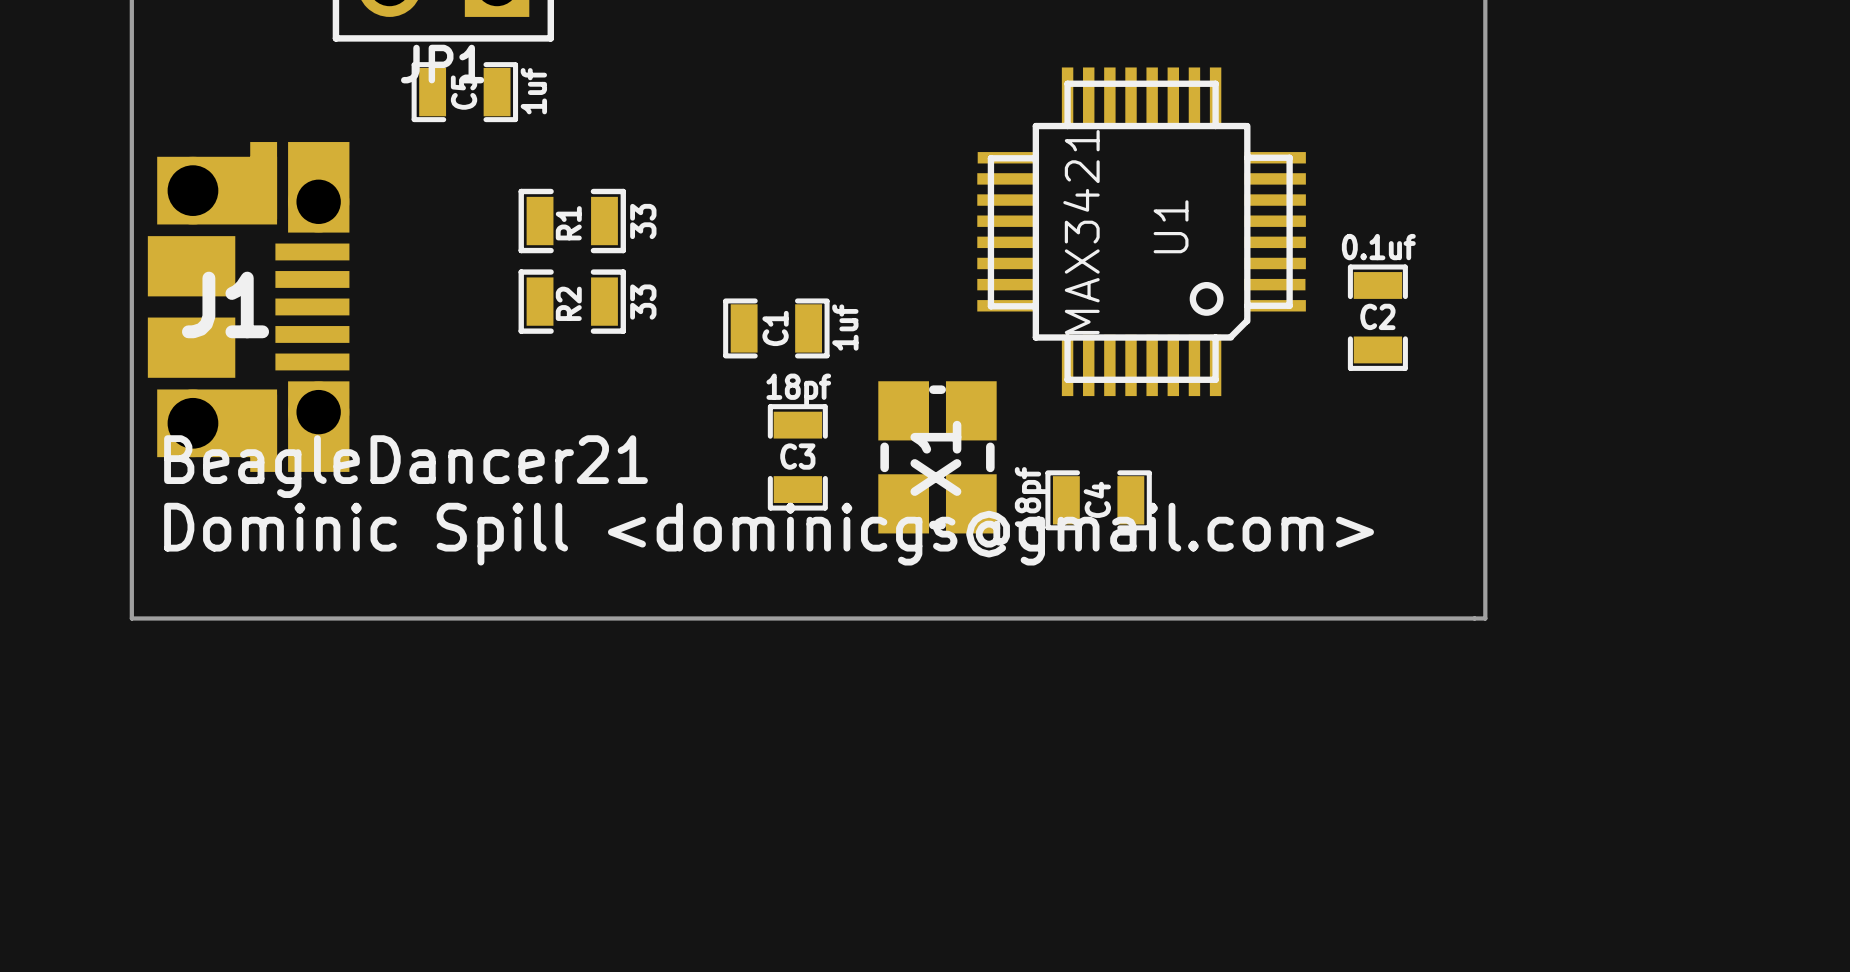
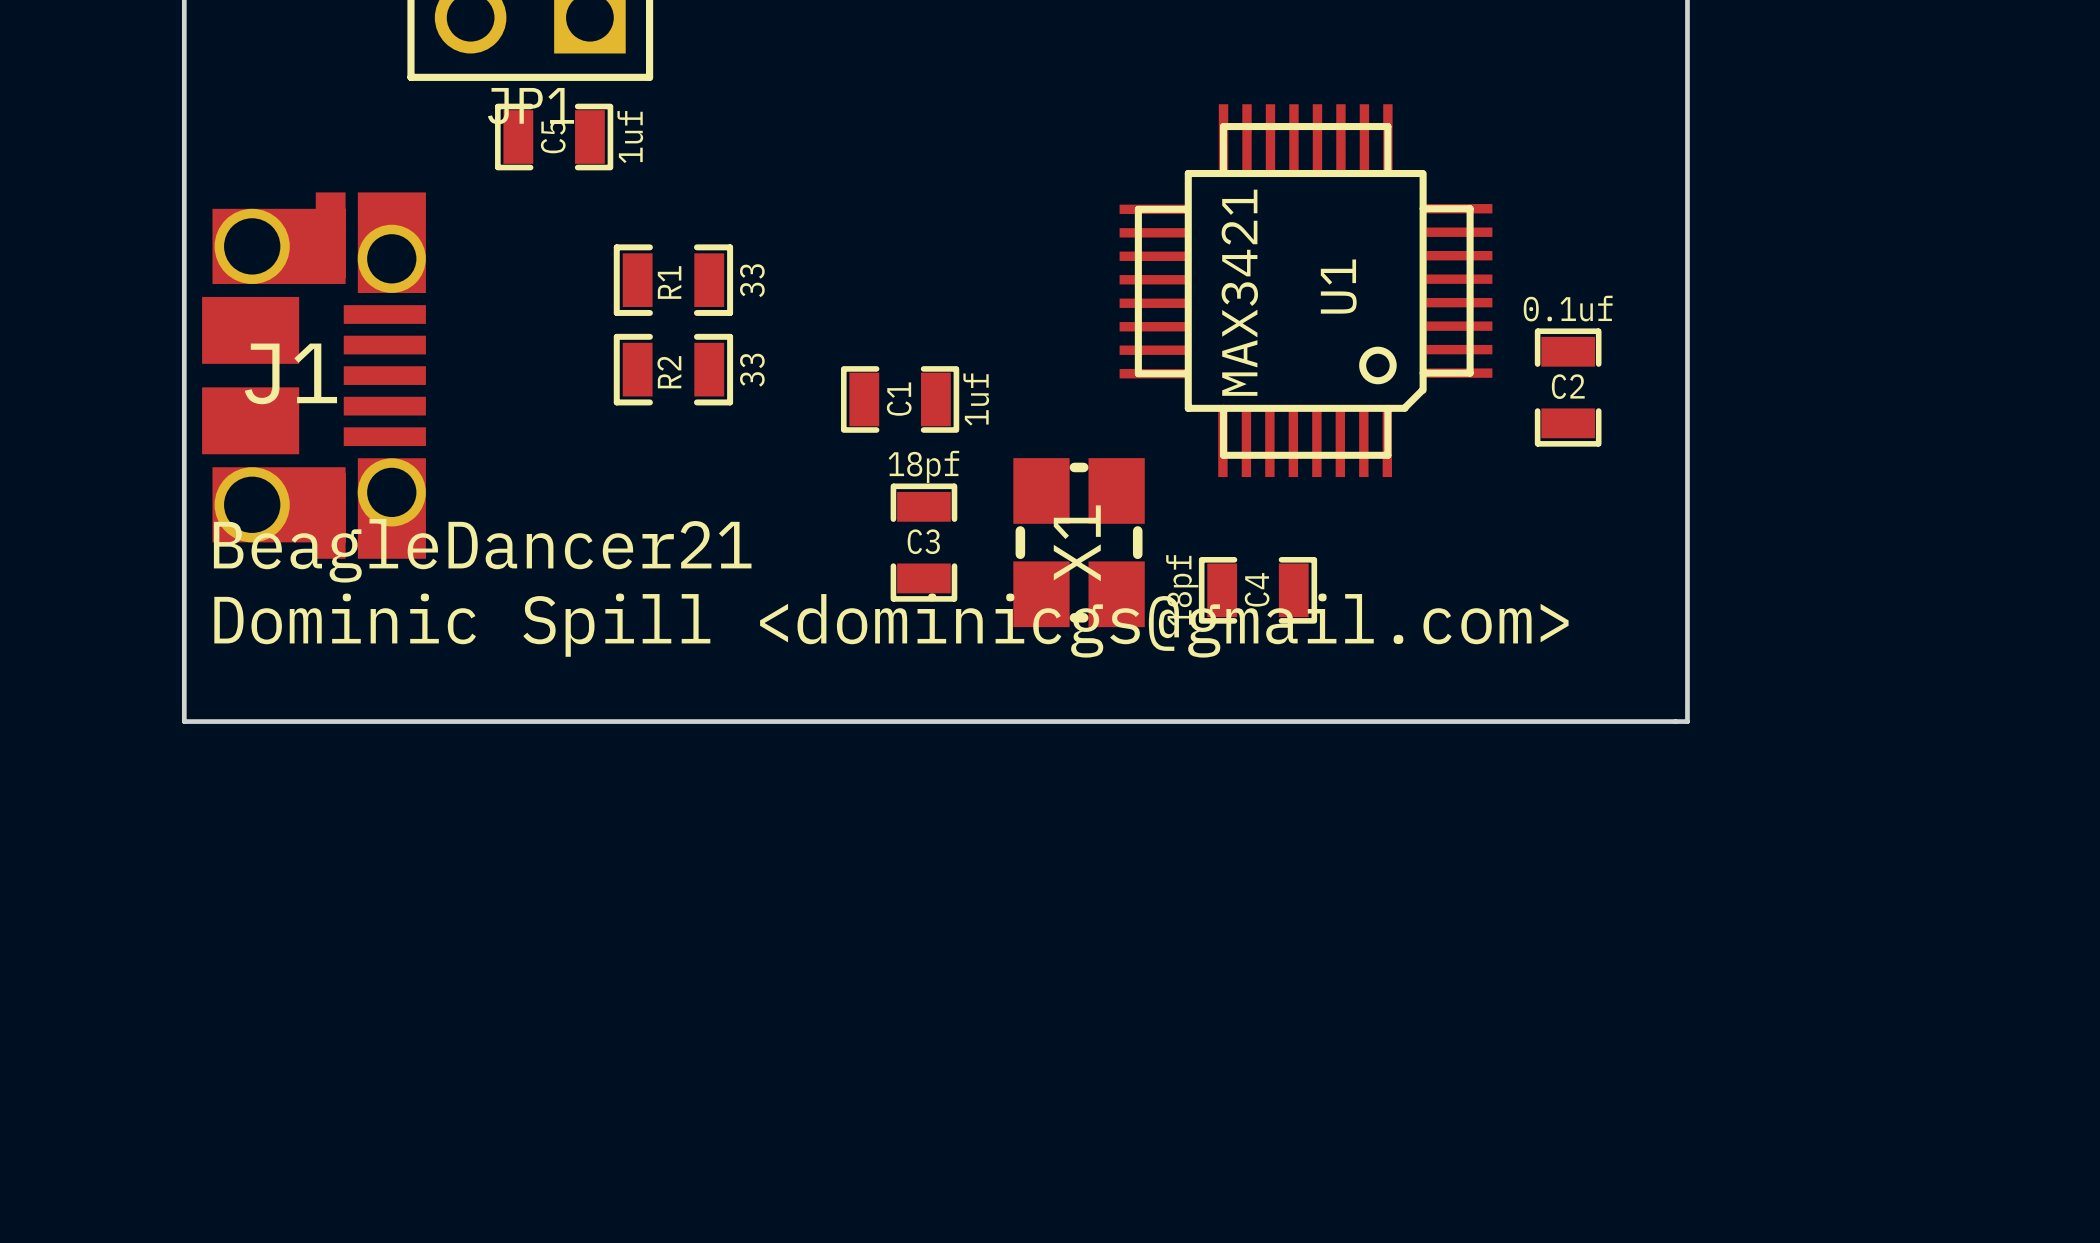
U1 footprint: [977, 67, 1306, 397] -> [1119, 104, 1493, 478]

